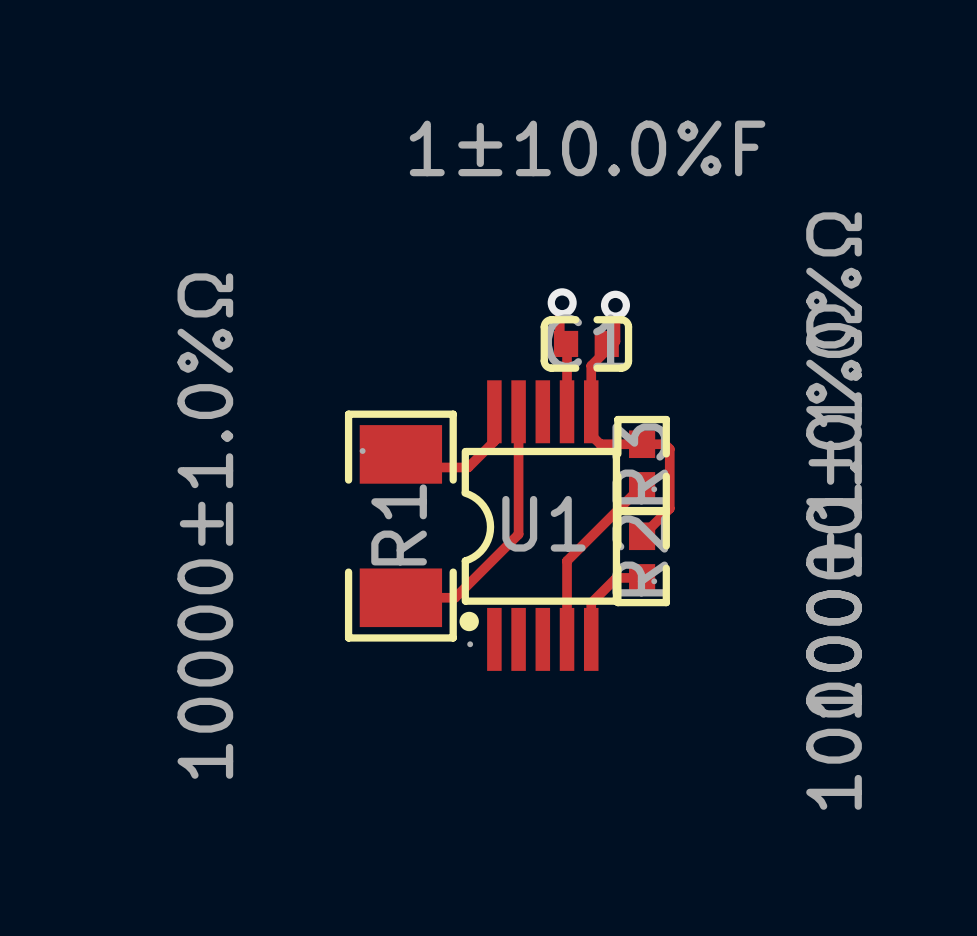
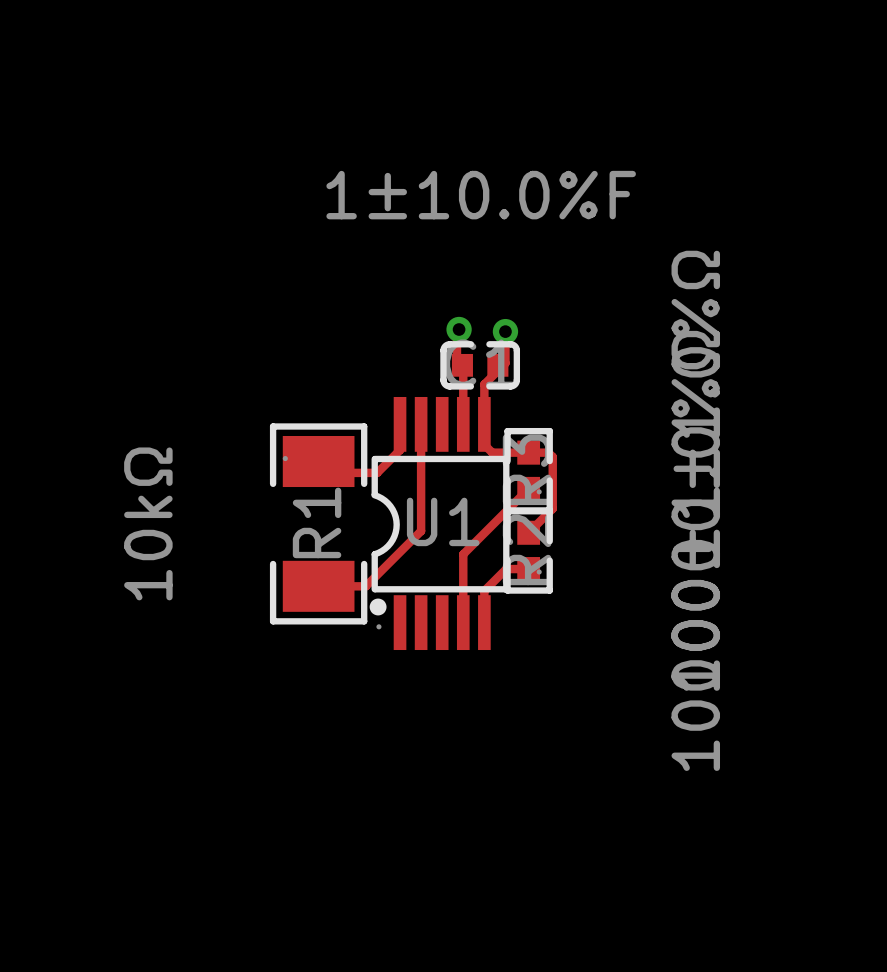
R1 value: 10000±1.0%Ω (205, 526) -> 10kΩ (148, 523)

